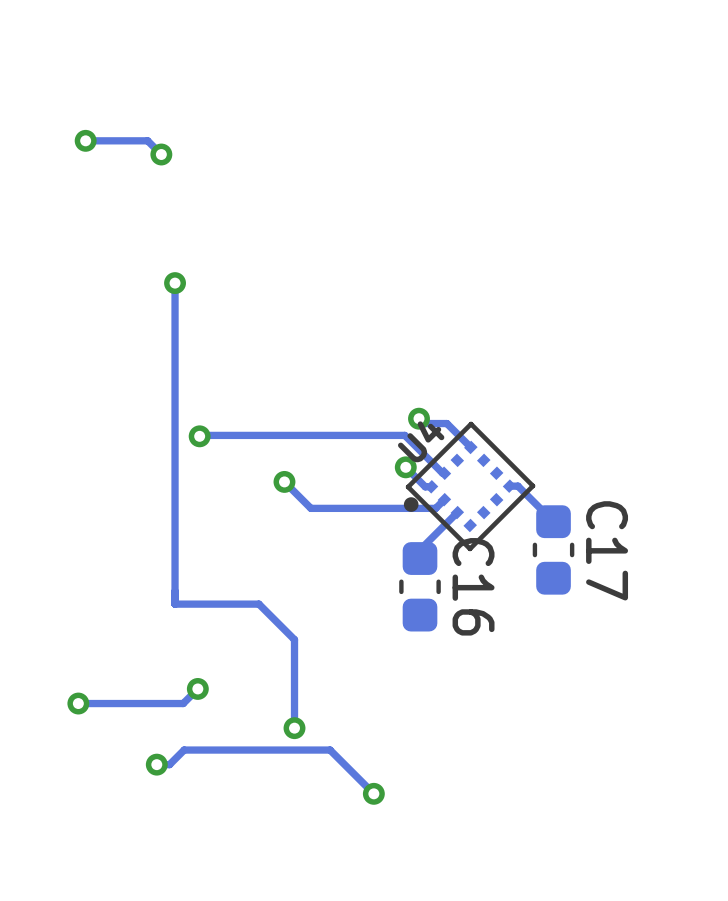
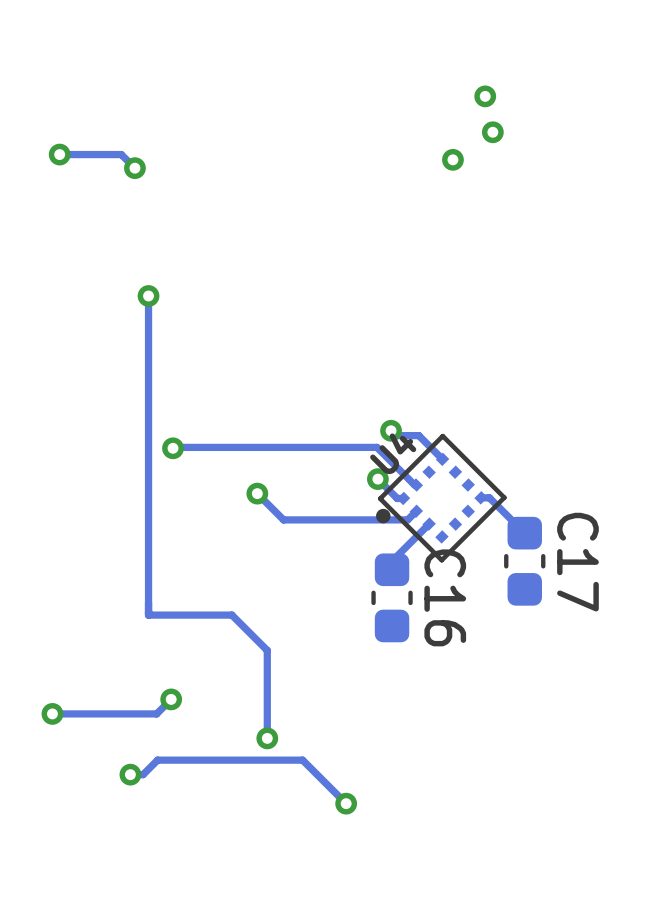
via: none -> (485, 96)
via: none -> (492, 132)
via: none -> (452, 159)

